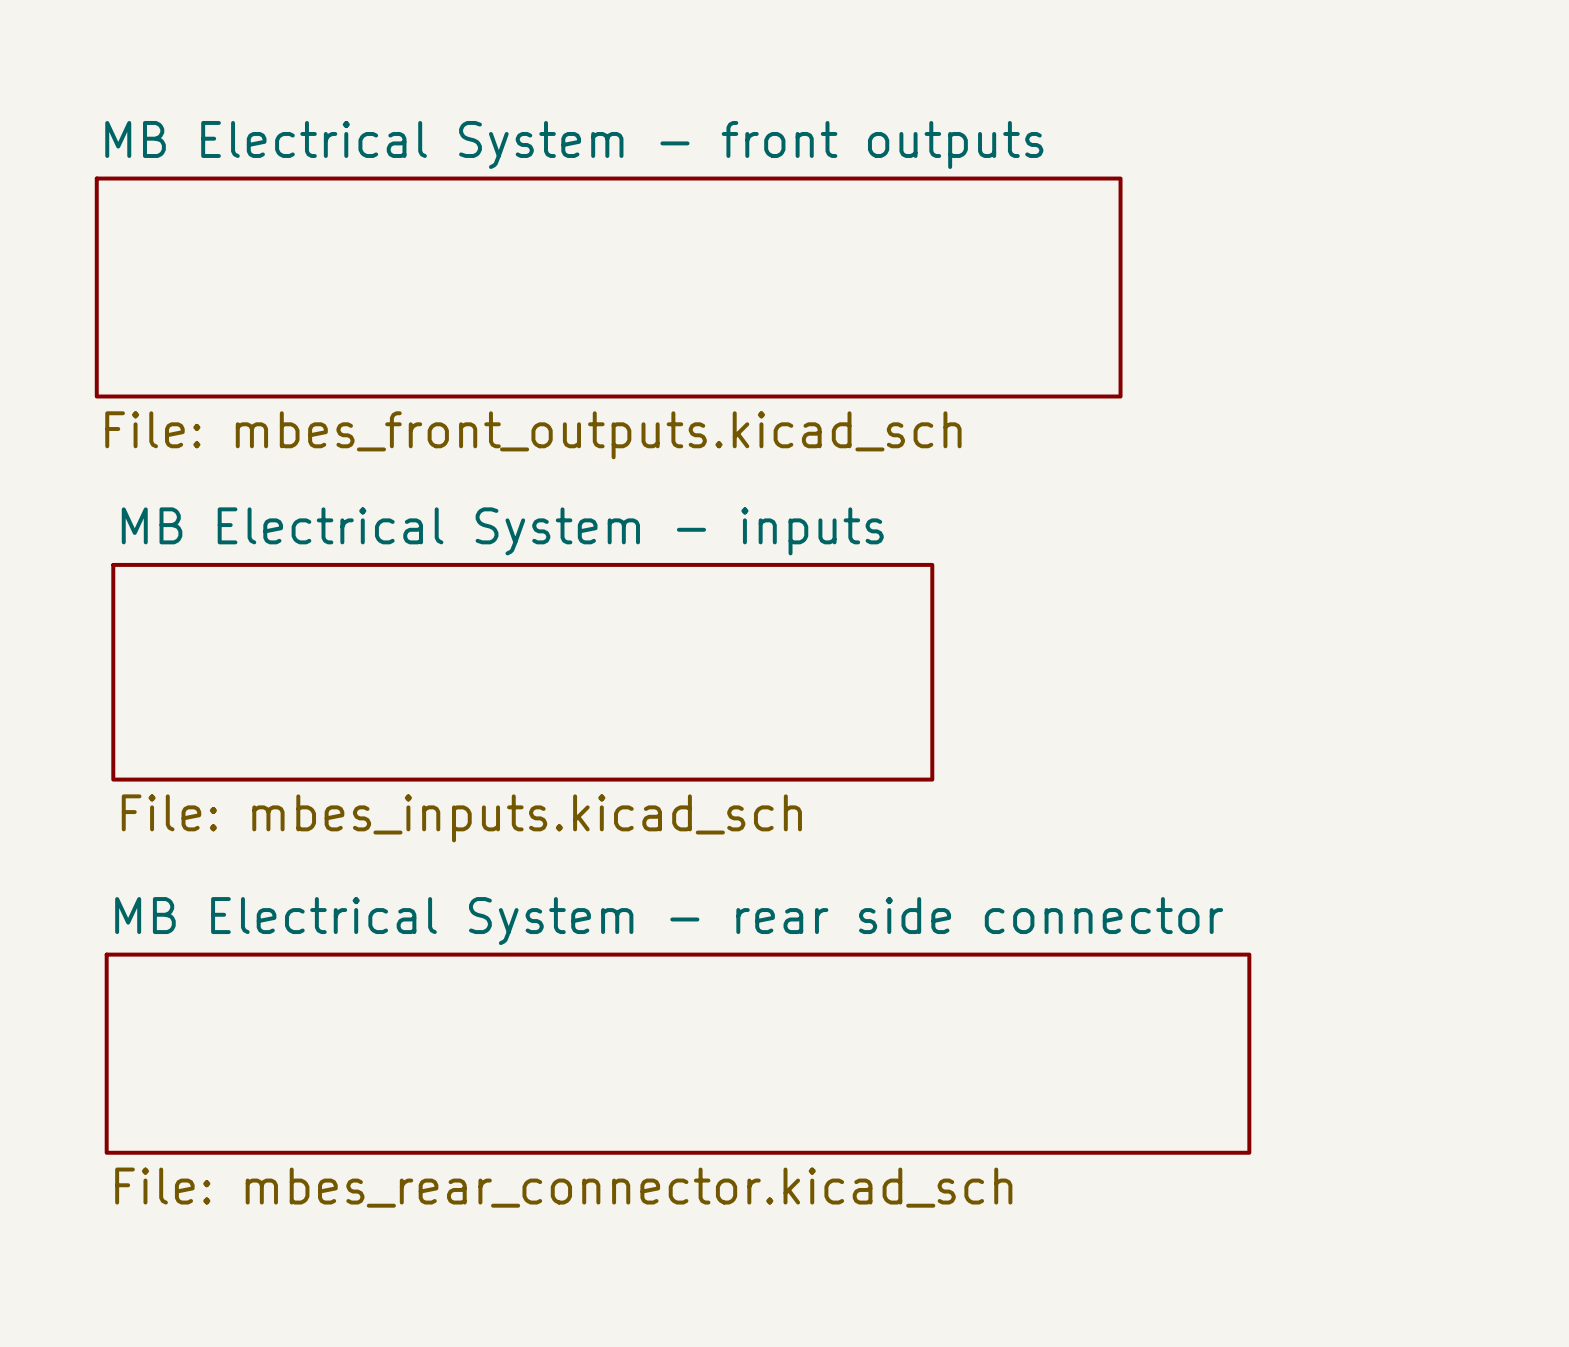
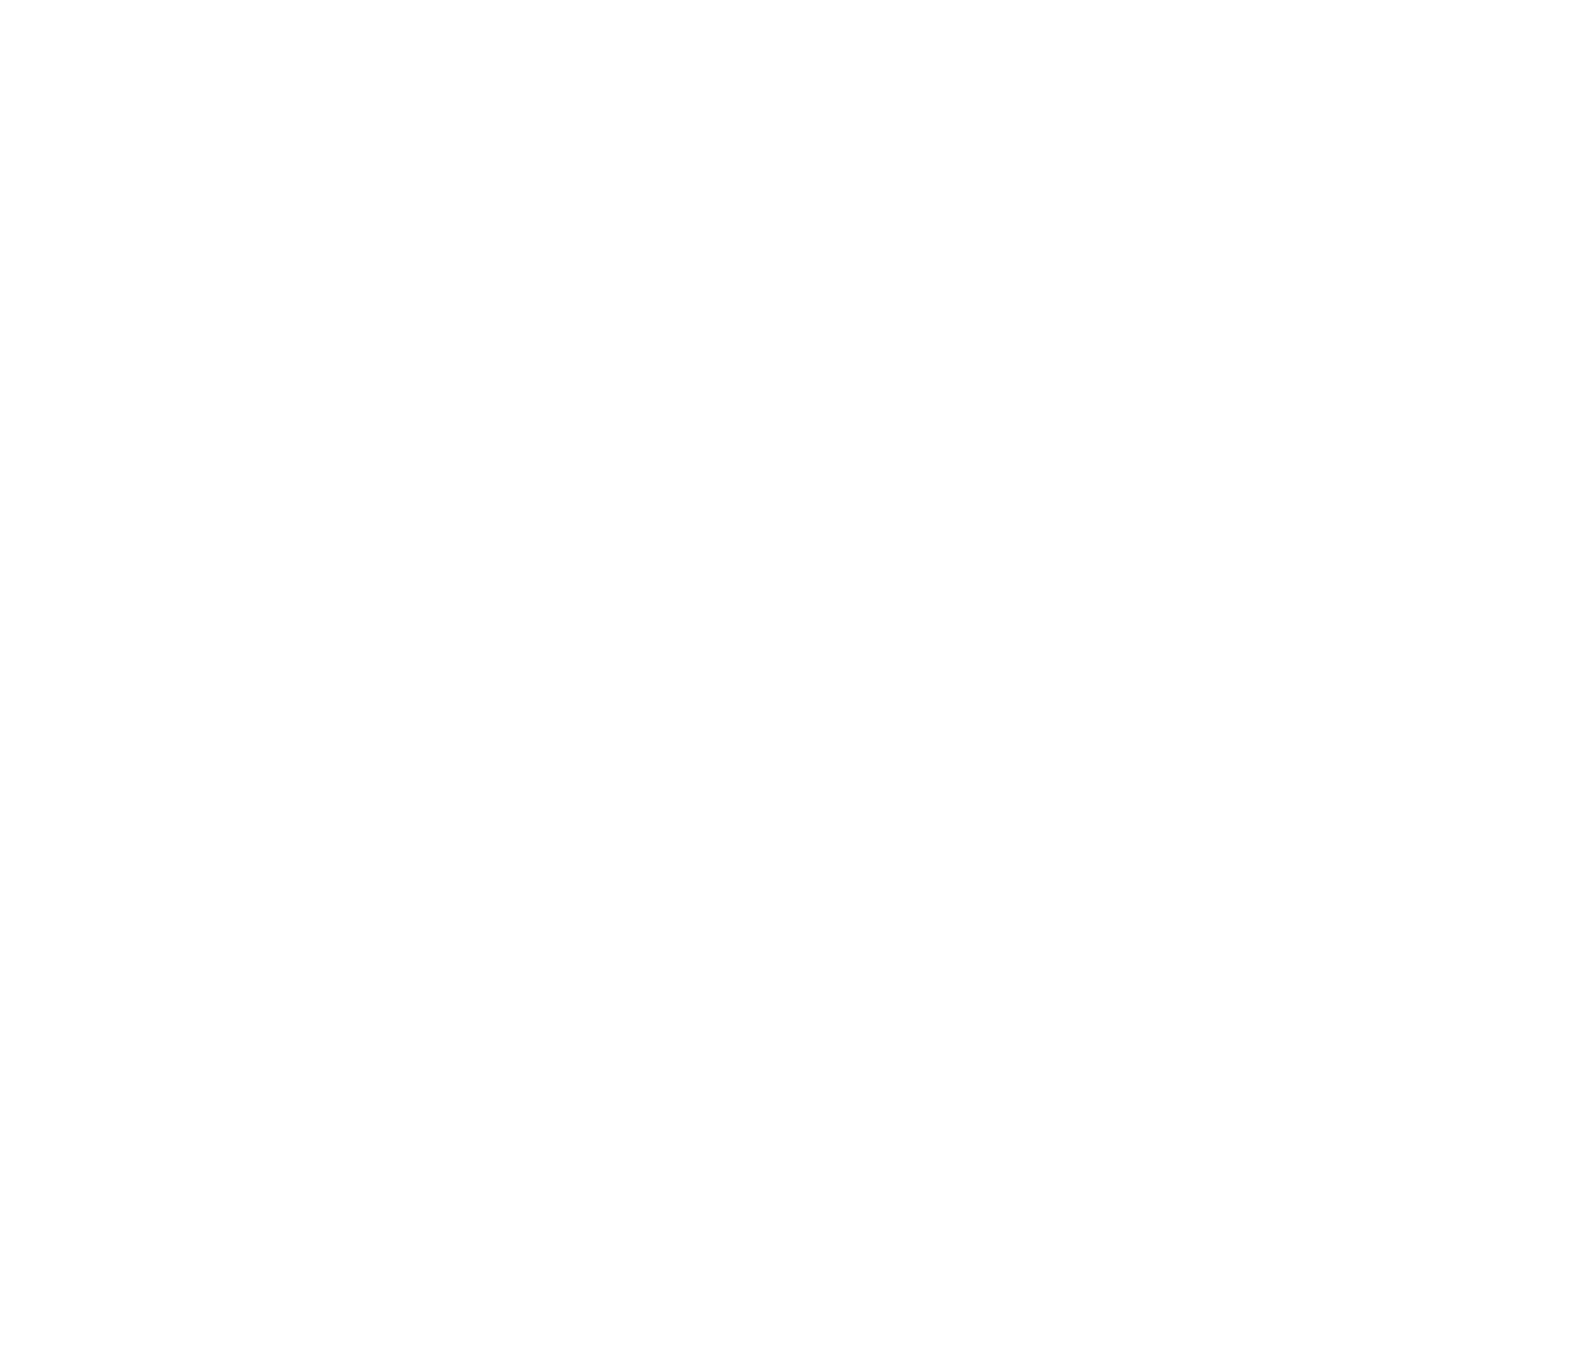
sheet MB Electrical System - front outputs: File: mbes_front_outputs.kicad_sch (608, 287) -> none
sheet MB Electrical System - inputs: File: mbes_inputs.kicad_sch (522, 672) -> none
sheet MB Electrical System - rear side connector: File: mbes_rear_connector.kicad_sch (678, 1053) -> none

